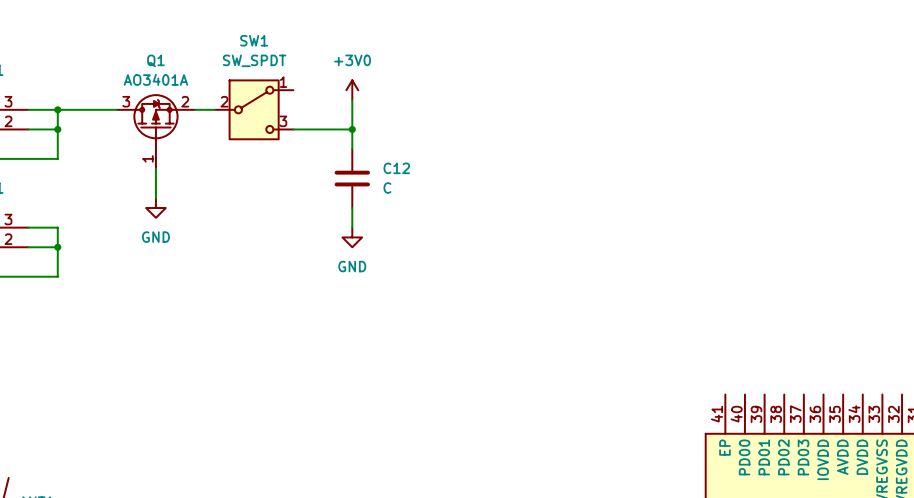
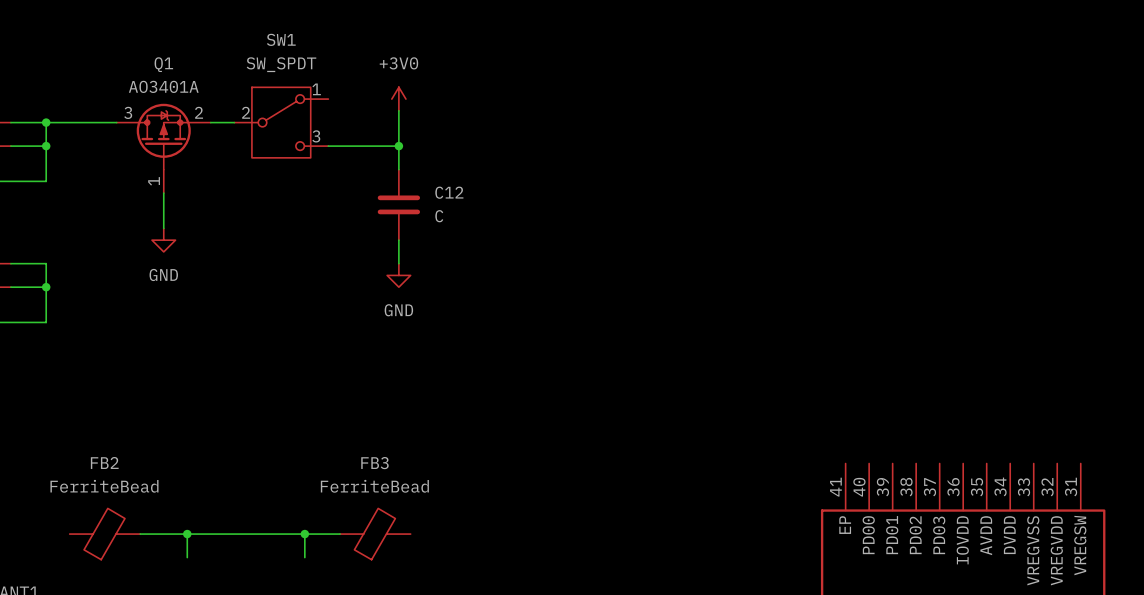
FB2: none -> FerriteBead (104, 534)
wire: none -> (140, 534) (340, 534)
wire: none -> (187, 534) (187, 557)
junction: none -> (187, 534)
wire: none -> (304, 534) (304, 557)
junction: none -> (304, 534)
FB3: none -> FerriteBead (375, 534)

